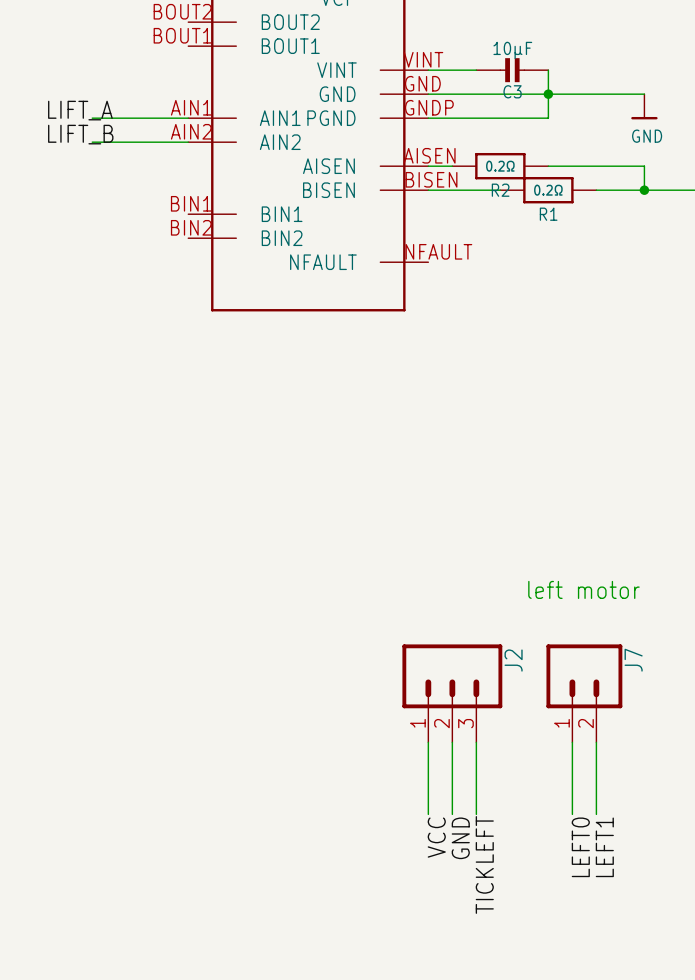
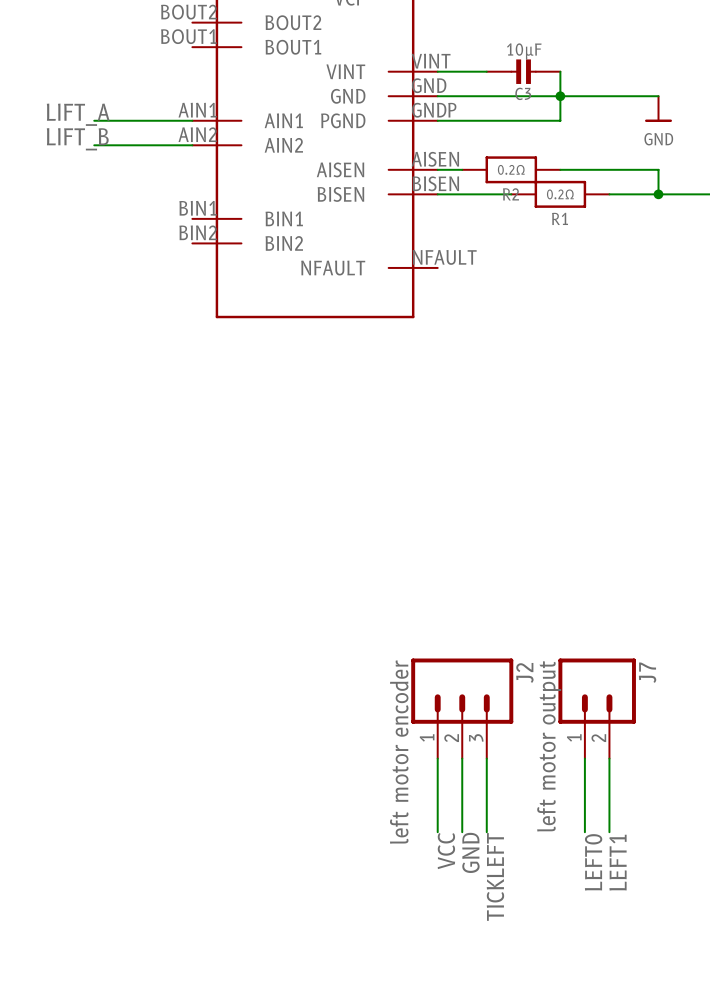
text: left motor (583, 589) -> none
J7 value: none -> left motor output (549, 746)
J2 value: none -> left motor encoder (399, 752)

